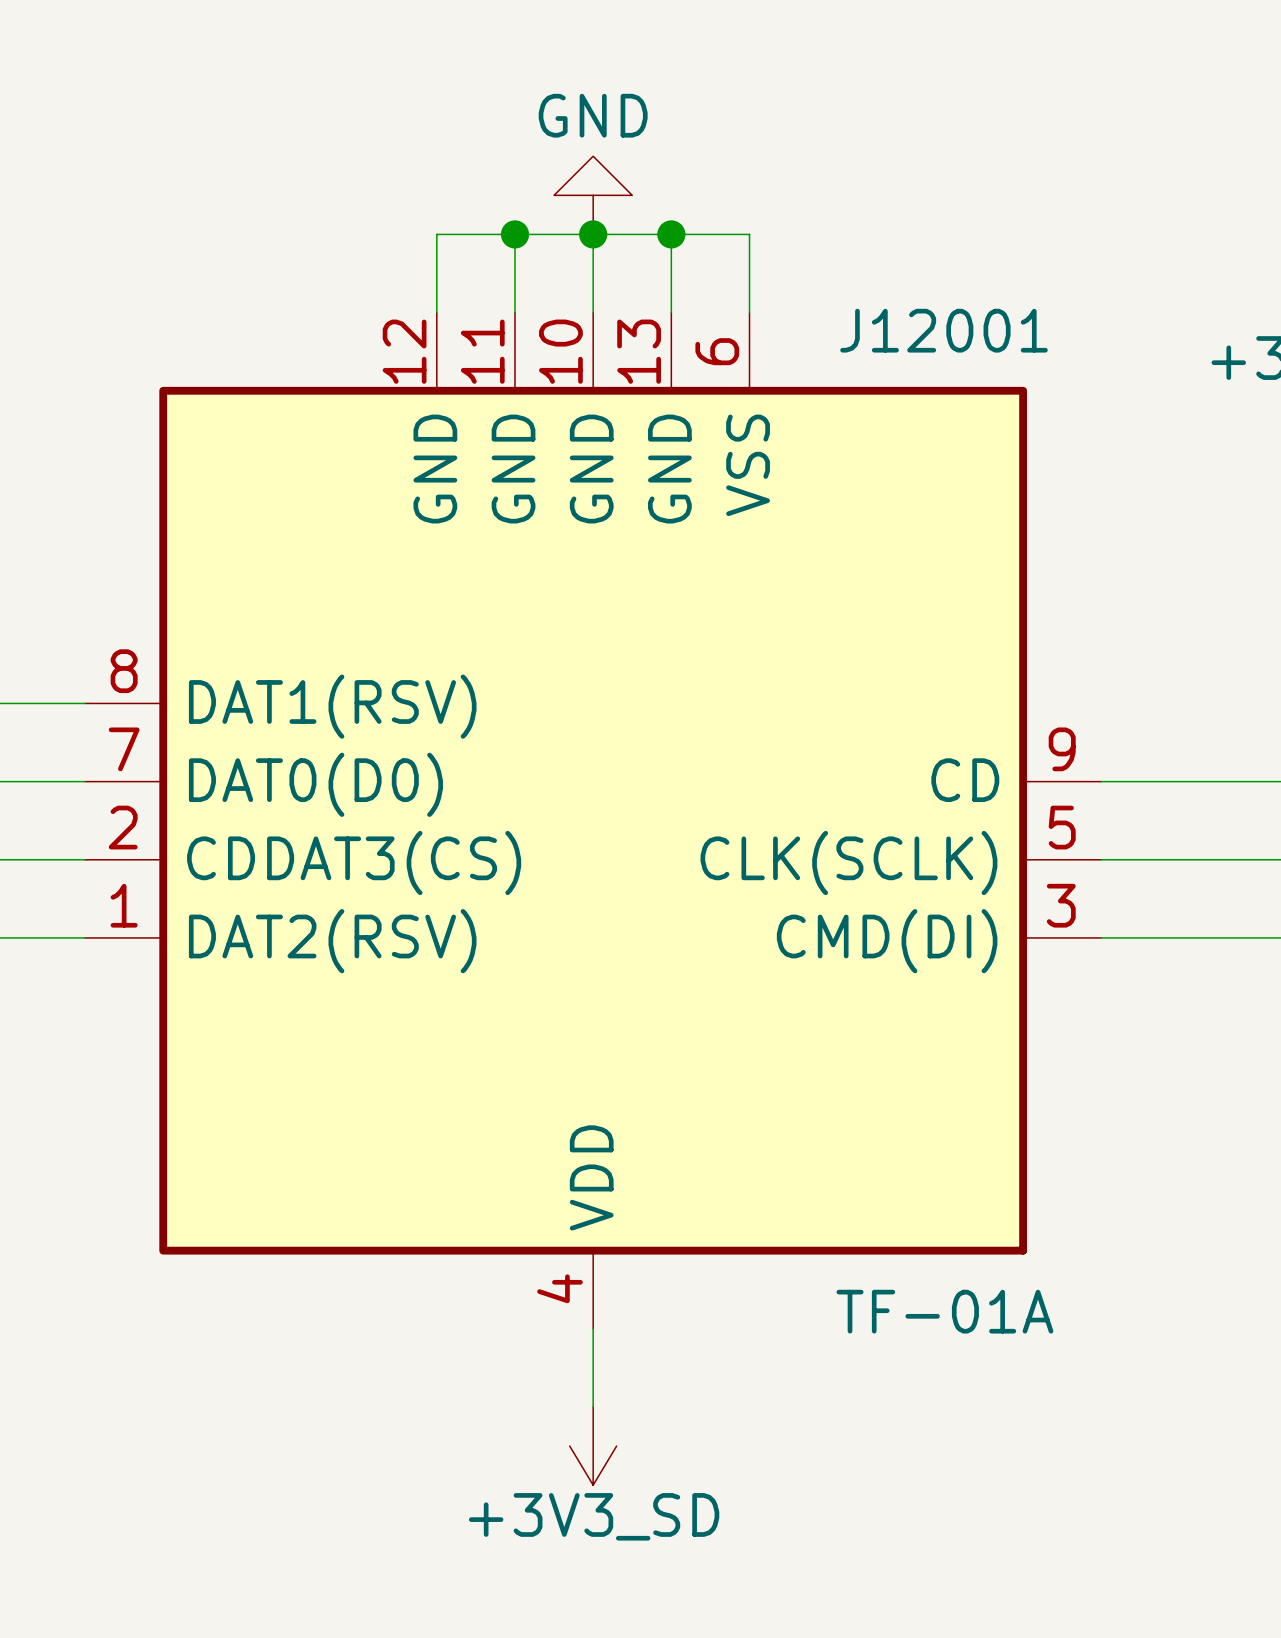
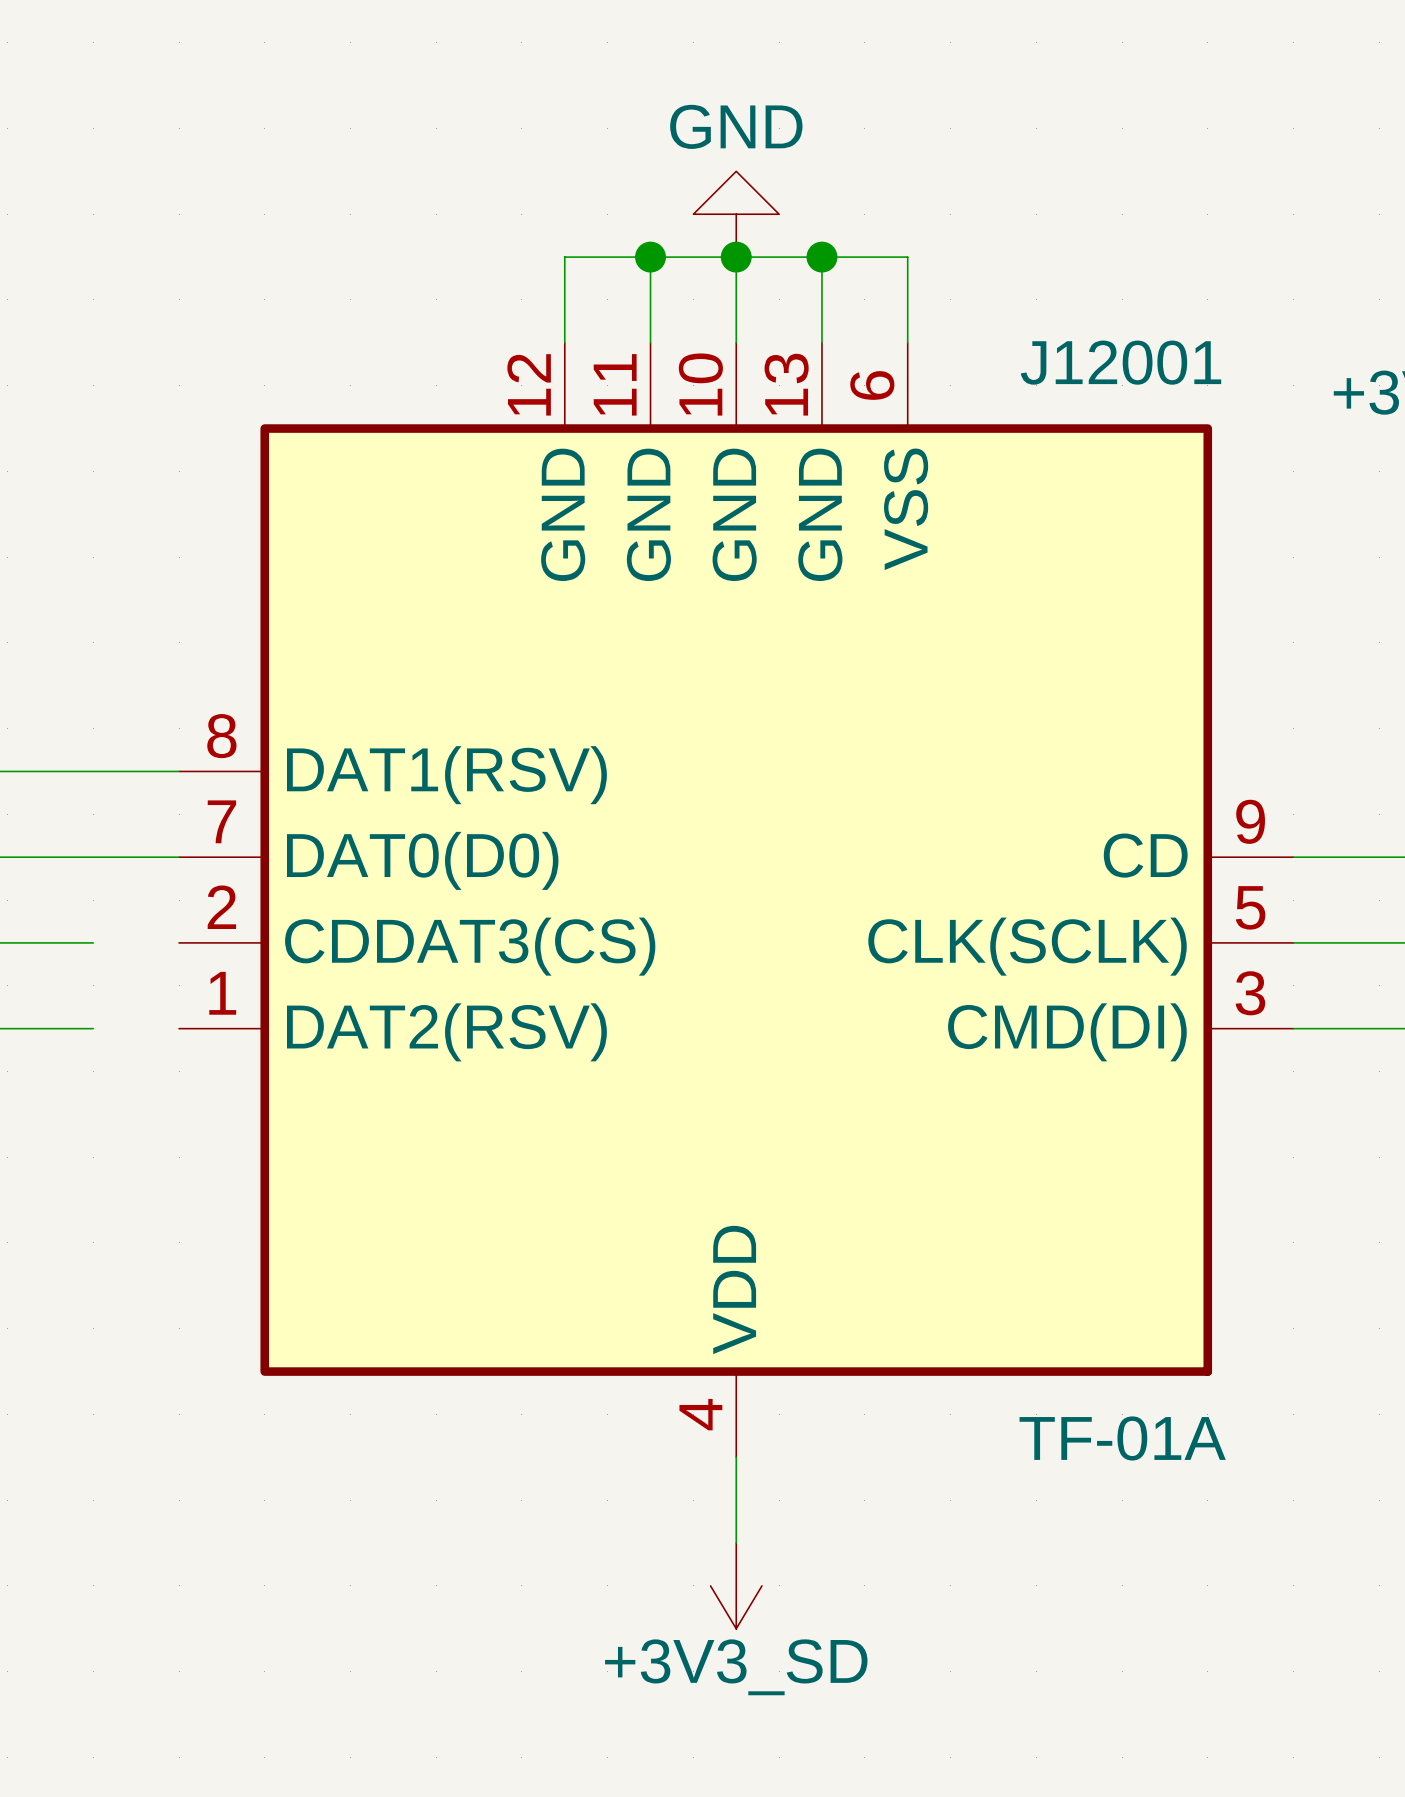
power symbol position: GND (593, 195) -> GND (736, 214)
wire: (515, 234) (436, 234) (436, 312) -> none
junction: (515, 234) -> none
wire: none -> (821, 257) (907, 257) (907, 342)
junction: none -> (821, 257)
J12001 position: (593, 820) -> (736, 900)
wire: (593, 1328) (593, 1406) -> (736, 1457) (736, 1543)
power symbol position: +3V3_SD (593, 1446) -> +3V3_SD (736, 1585)

